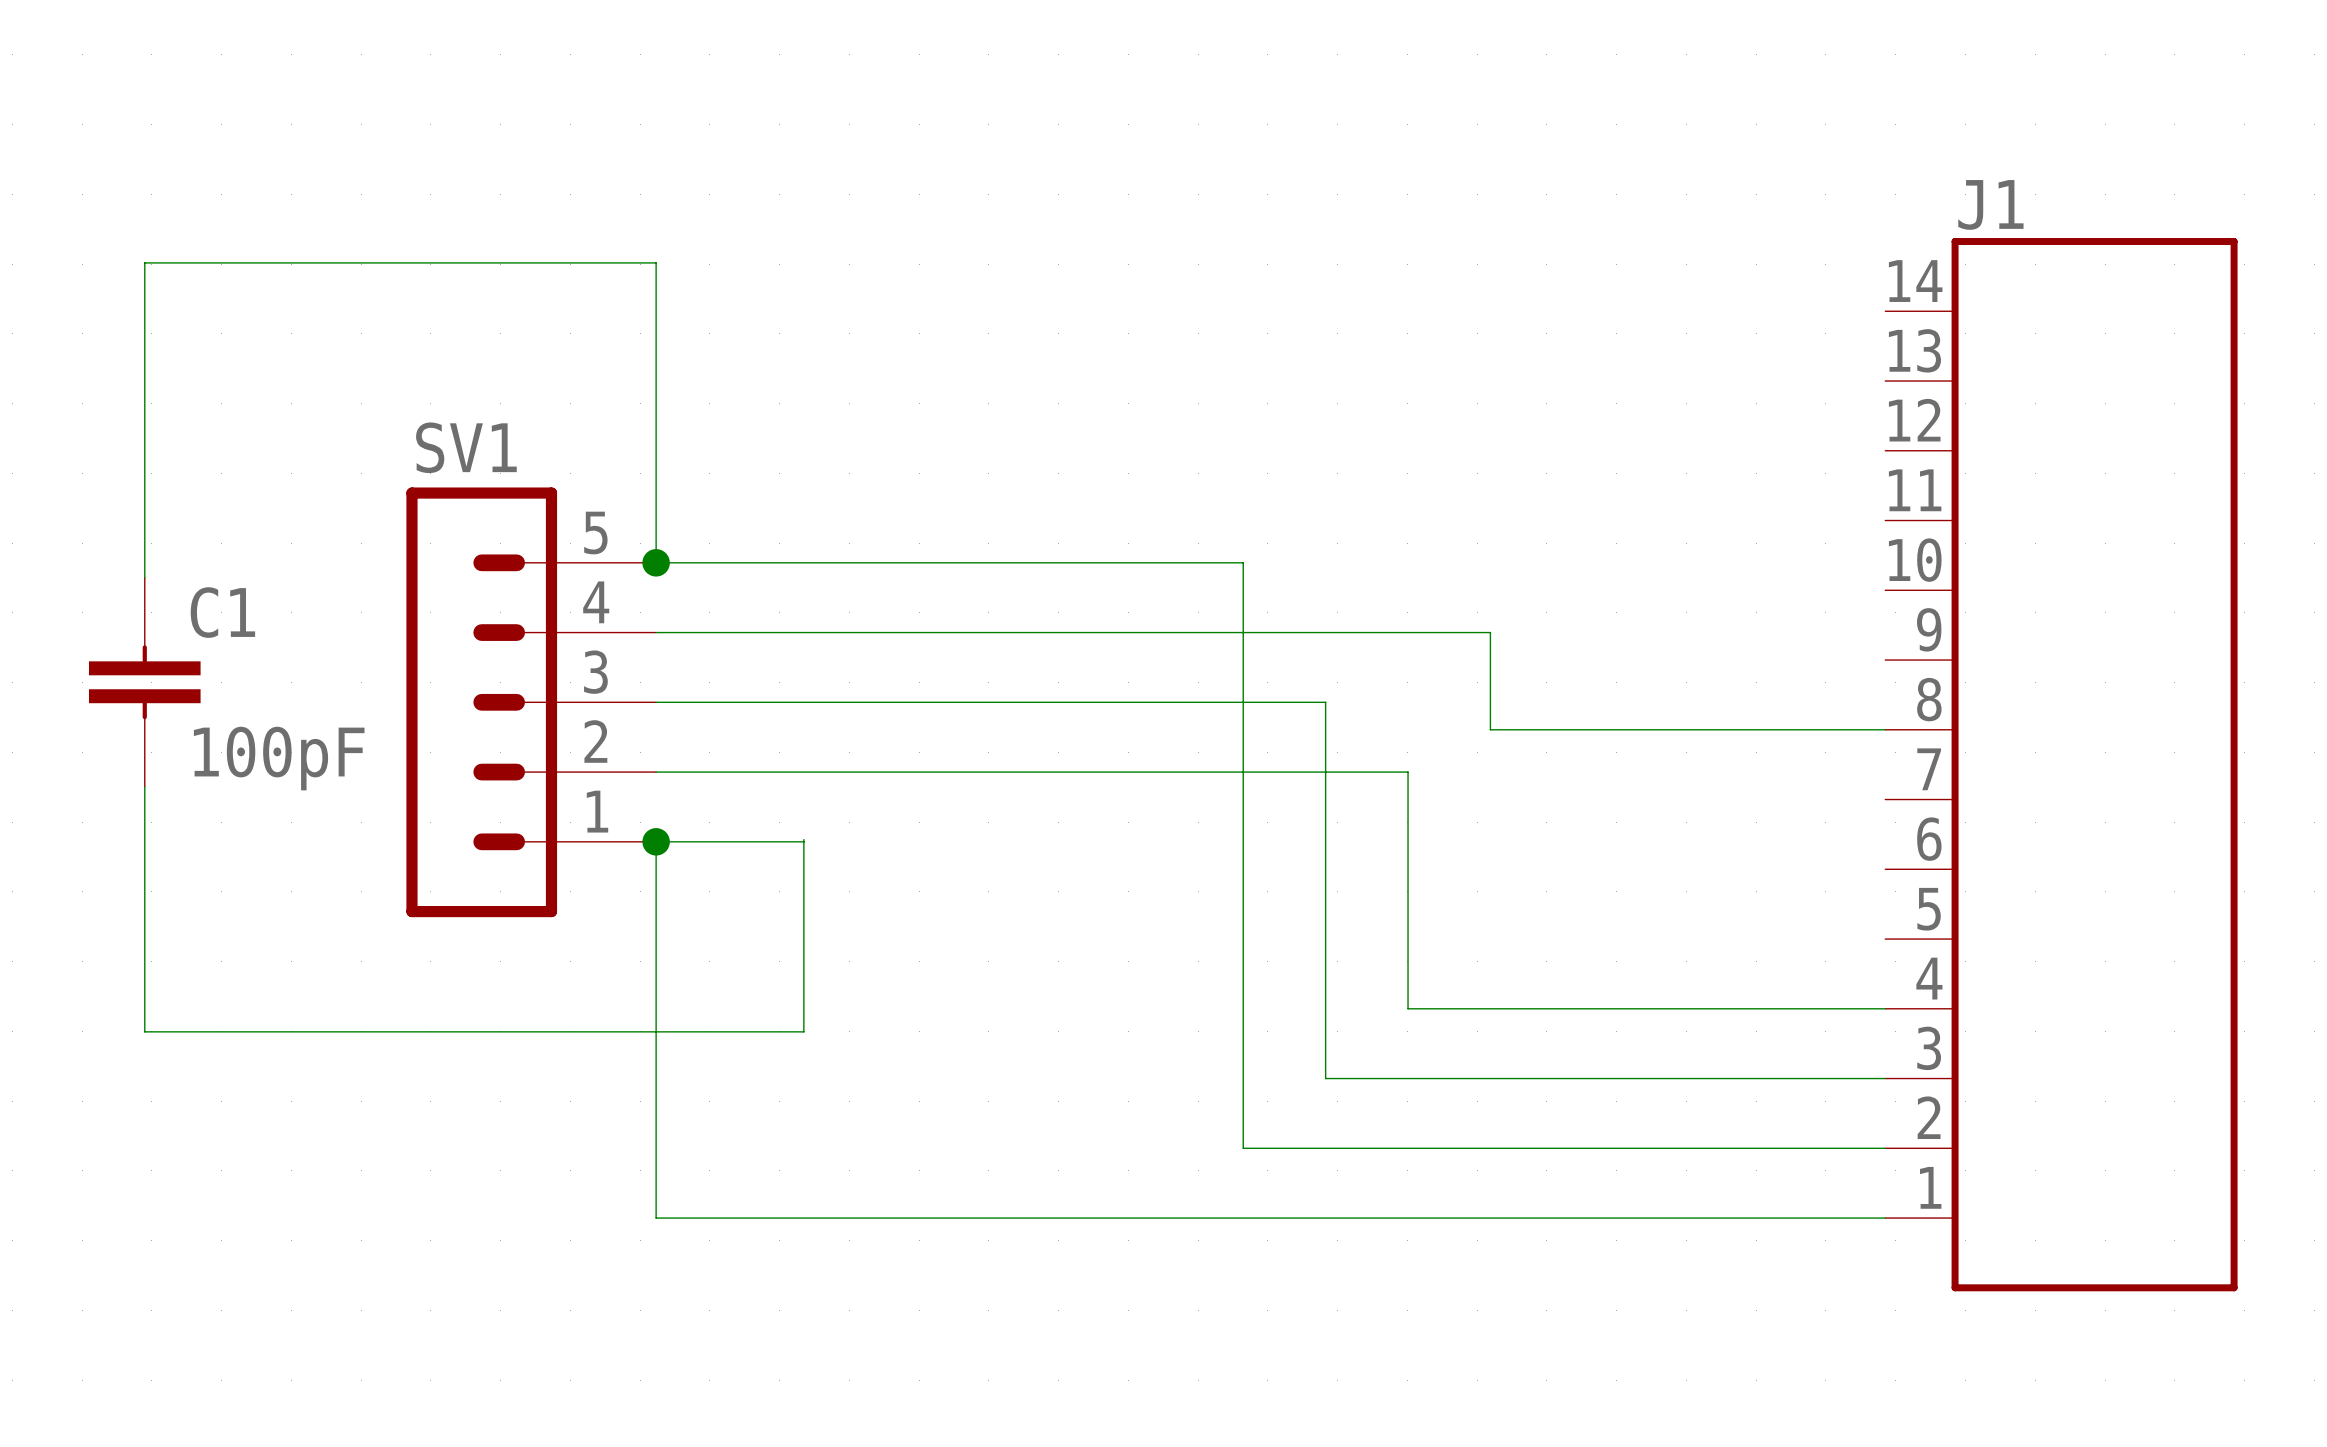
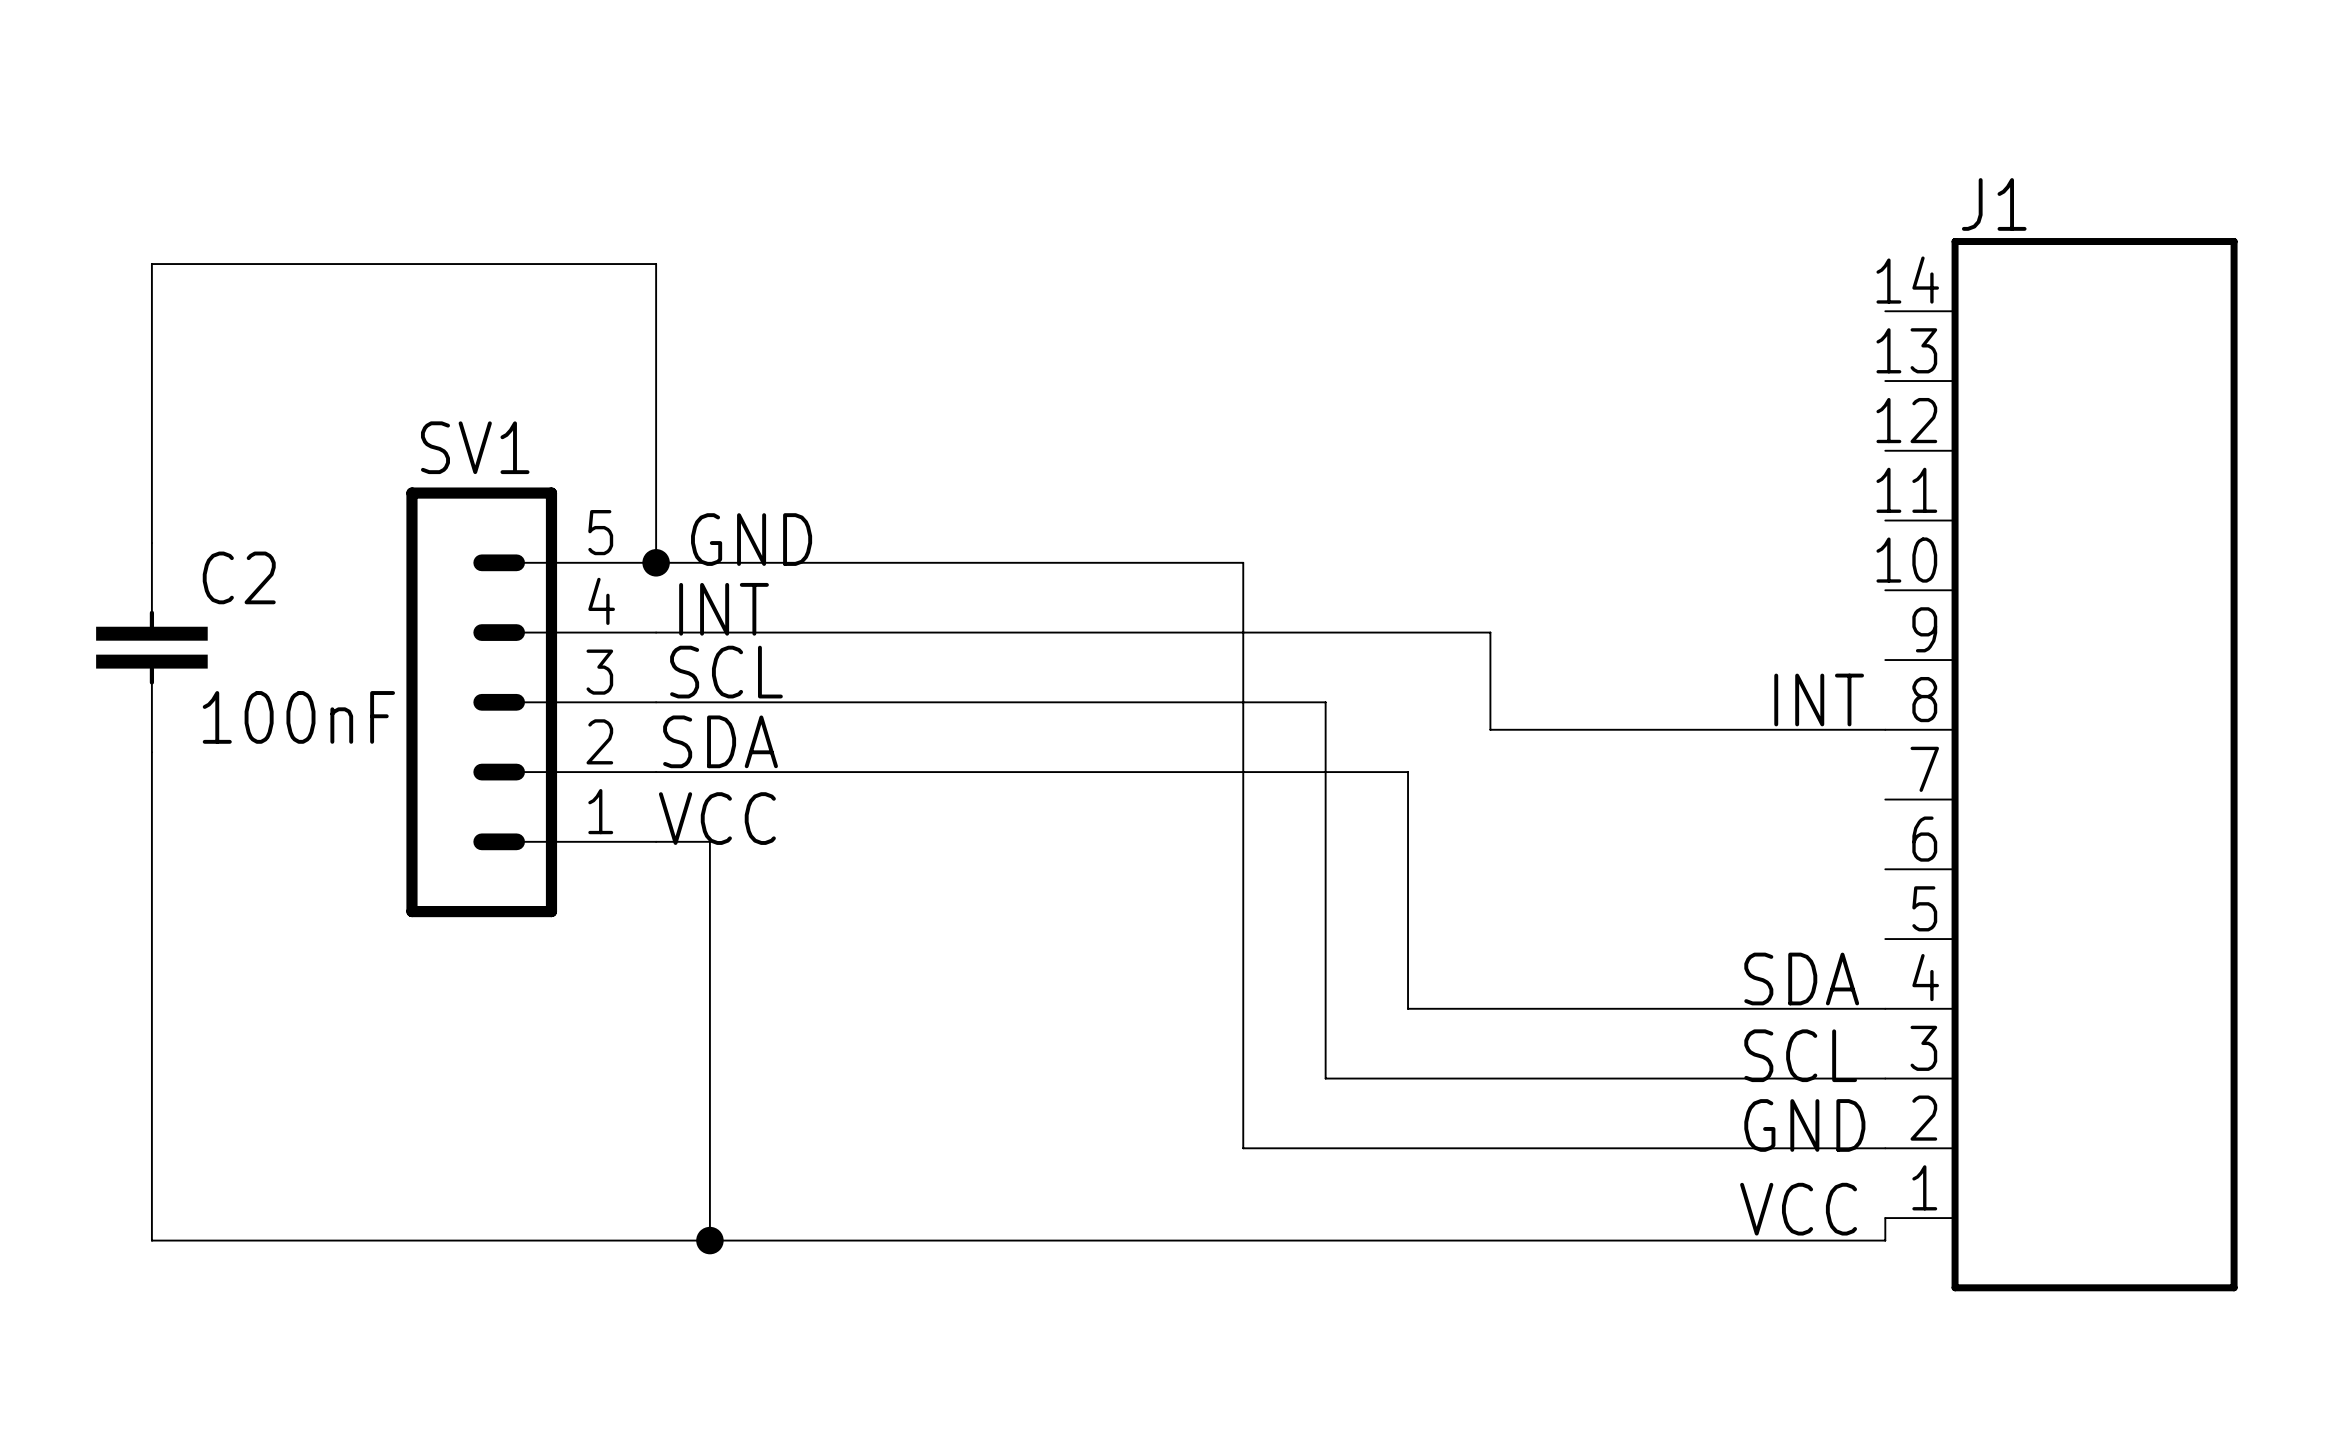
wire: (656, 264) (144, 262) (144, 577) -> (656, 264) (151, 264) (151, 543)
label: none -> GND (751, 539)
label: none -> INT (724, 609)
C2: none -> 100nF (151, 647)
label: none -> SCL (726, 672)
C1: 100pF (144, 682) -> none
label: none -> INT (1819, 699)
label: none -> SDA (720, 741)
wire: (144, 786) (144, 1031) (803, 1031) (803, 839) -> none
label: none -> VCC (717, 818)
wire: (656, 841) (656, 1218) (1885, 1218) -> (151, 752) (151, 1240) (1885, 1240) (1885, 1218)
junction: (656, 841) -> none
wire: (709, 841) (803, 841) -> (709, 841) (709, 1240)
label: none -> SDA (1801, 979)
label: none -> SCL (1800, 1055)
label: none -> GND (1804, 1125)
label: none -> VCC (1798, 1209)
junction: none -> (709, 1240)

